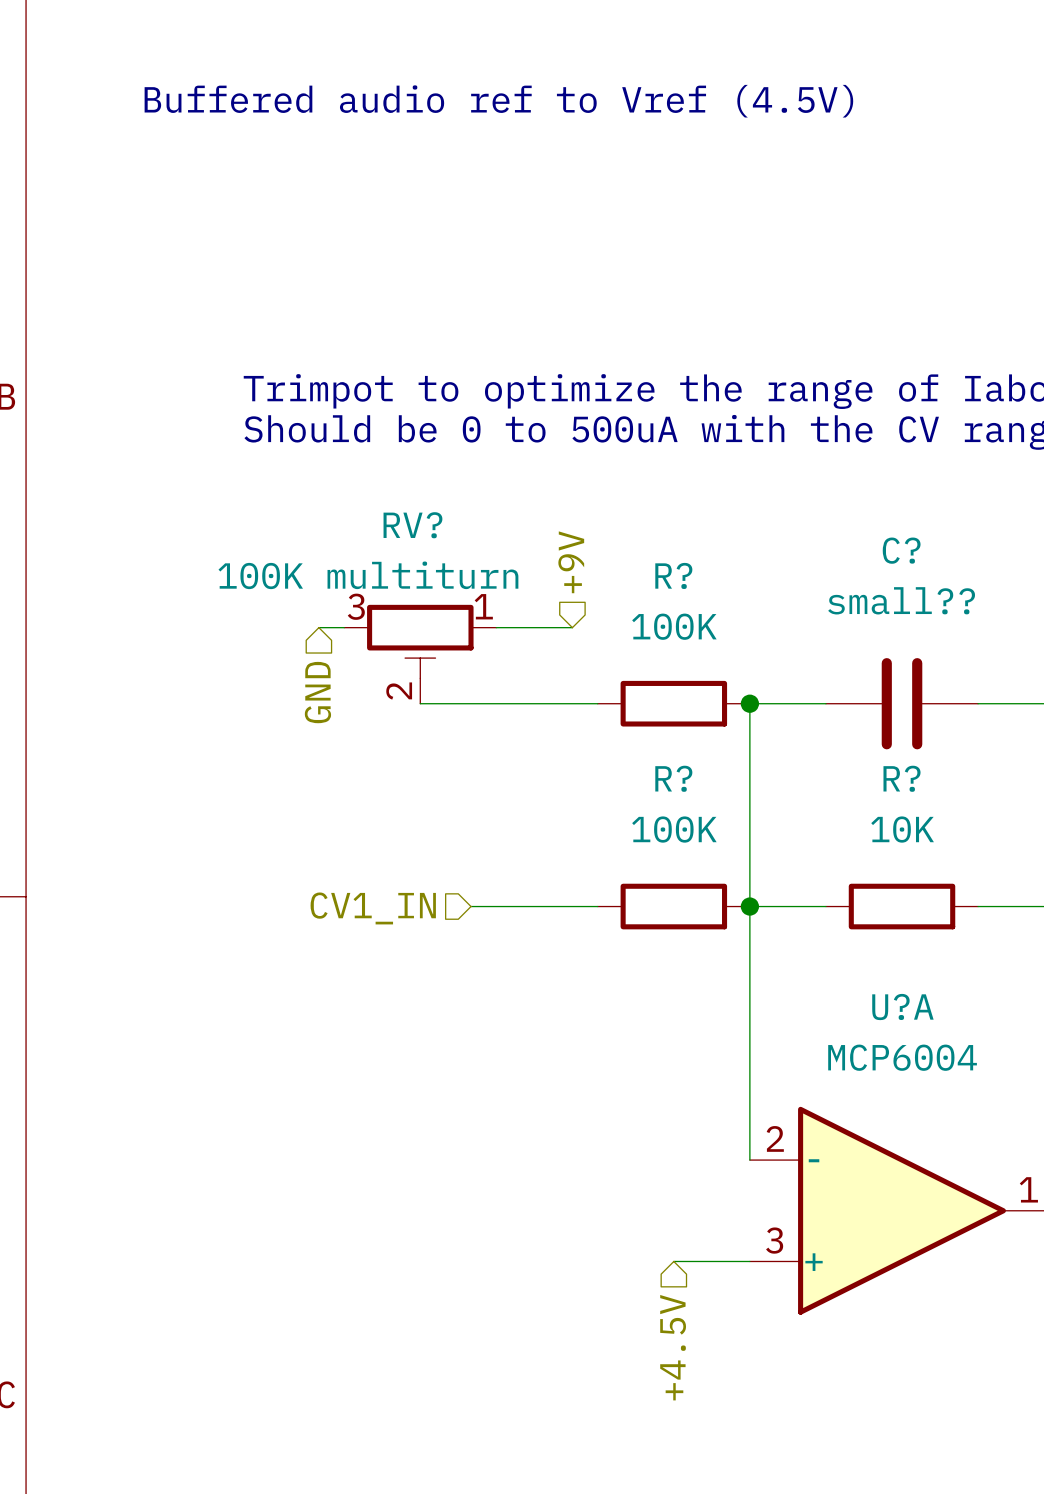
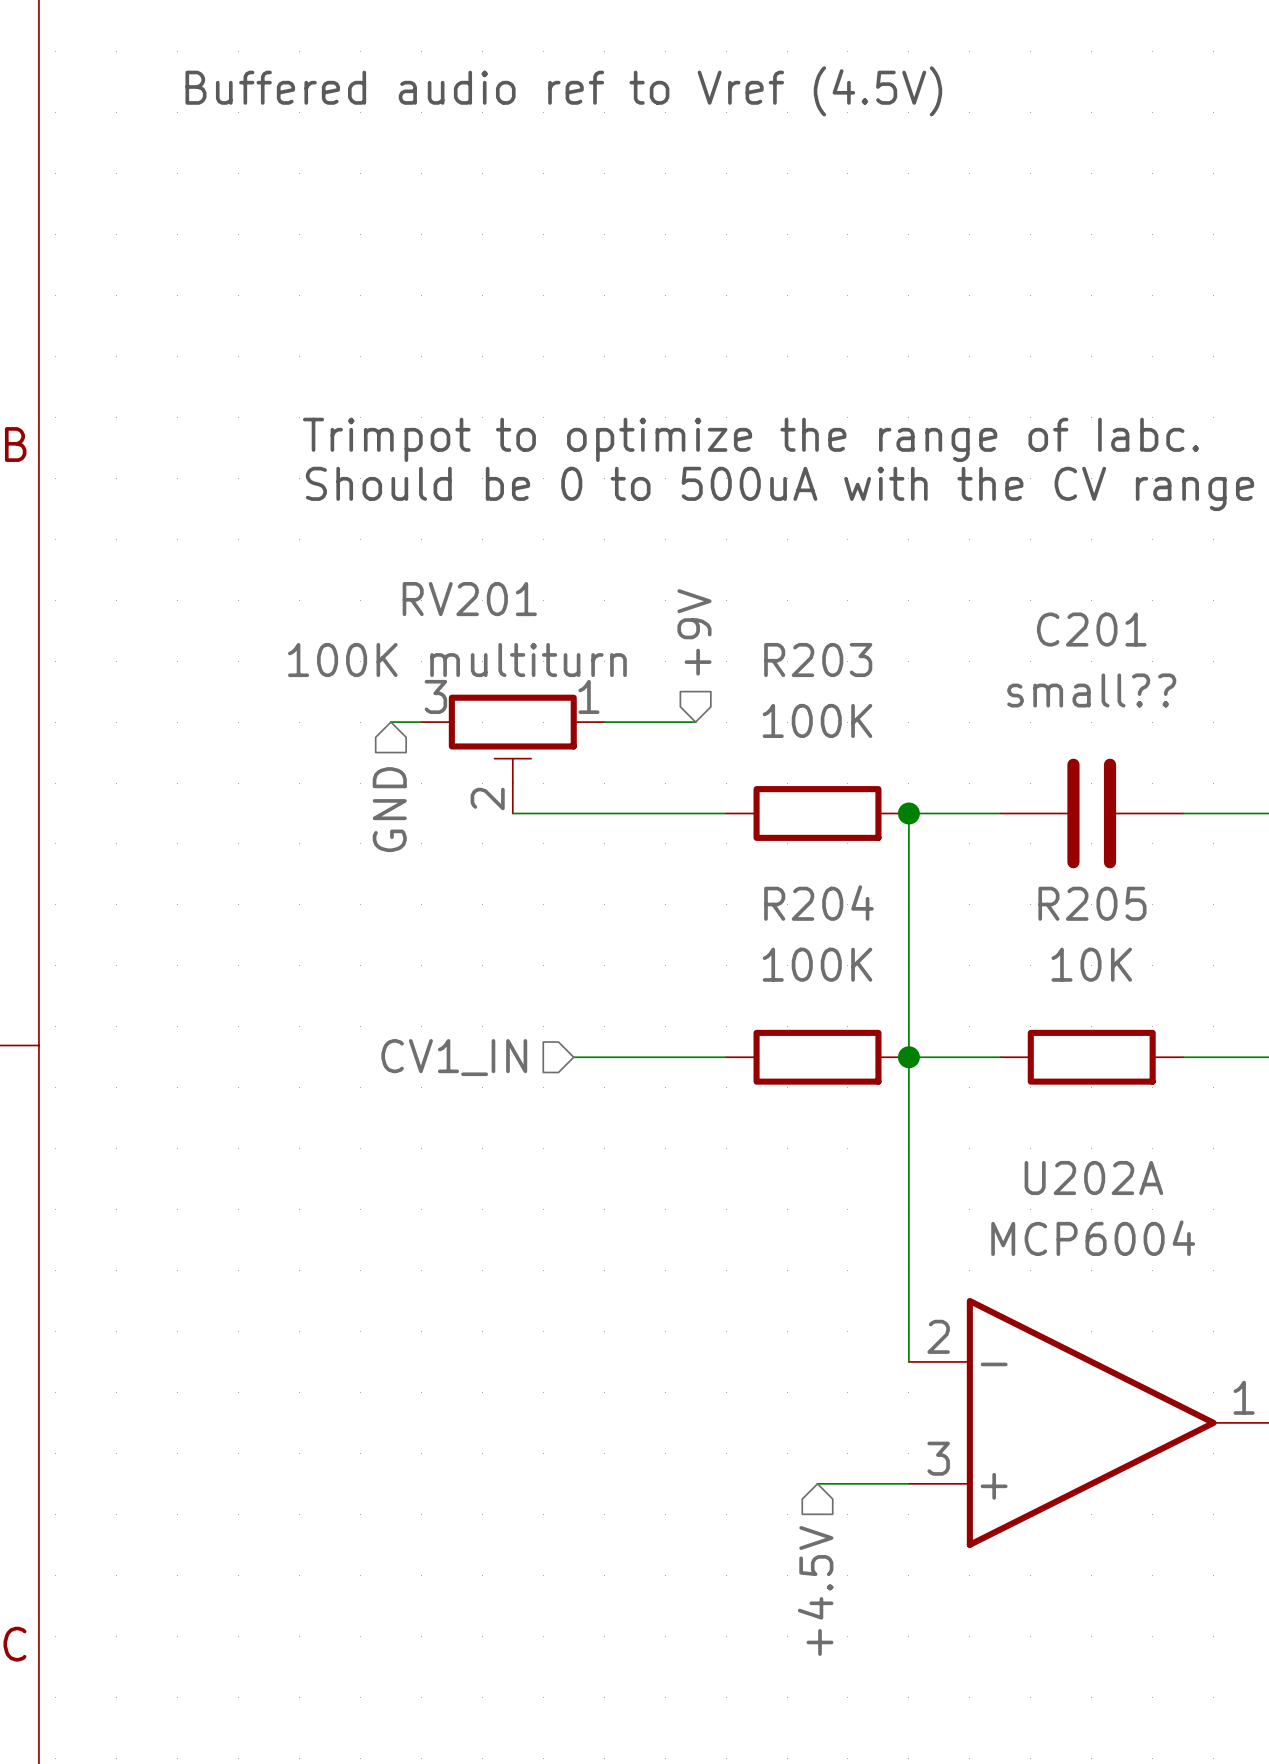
RV? name: RV? (412, 525) -> RV201 (469, 599)
C? name: C? (901, 550) -> C201 (1091, 629)
R? name: R? (673, 575) -> R203 (818, 660)
R? name: R? (673, 778) -> R204 (818, 903)
R? name: R? (902, 778) -> R205 (1092, 903)
U?A name: U?A (902, 1007) -> U202A (1093, 1178)

